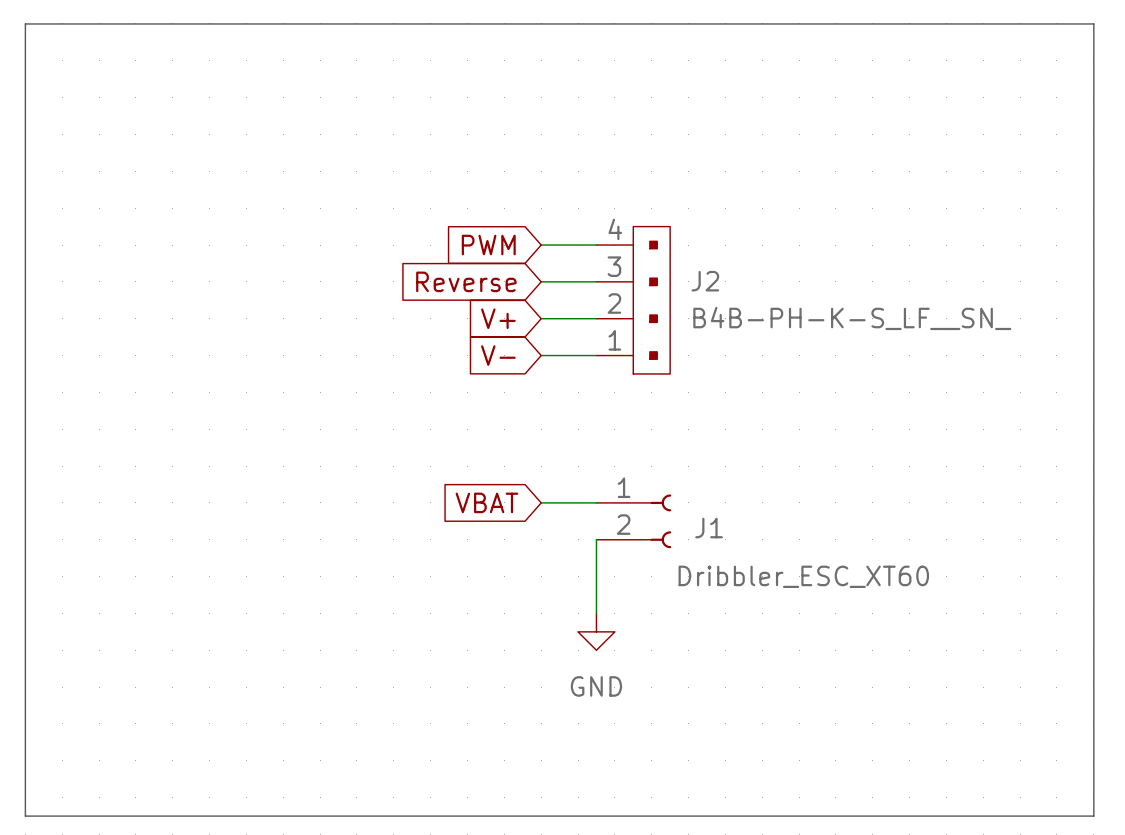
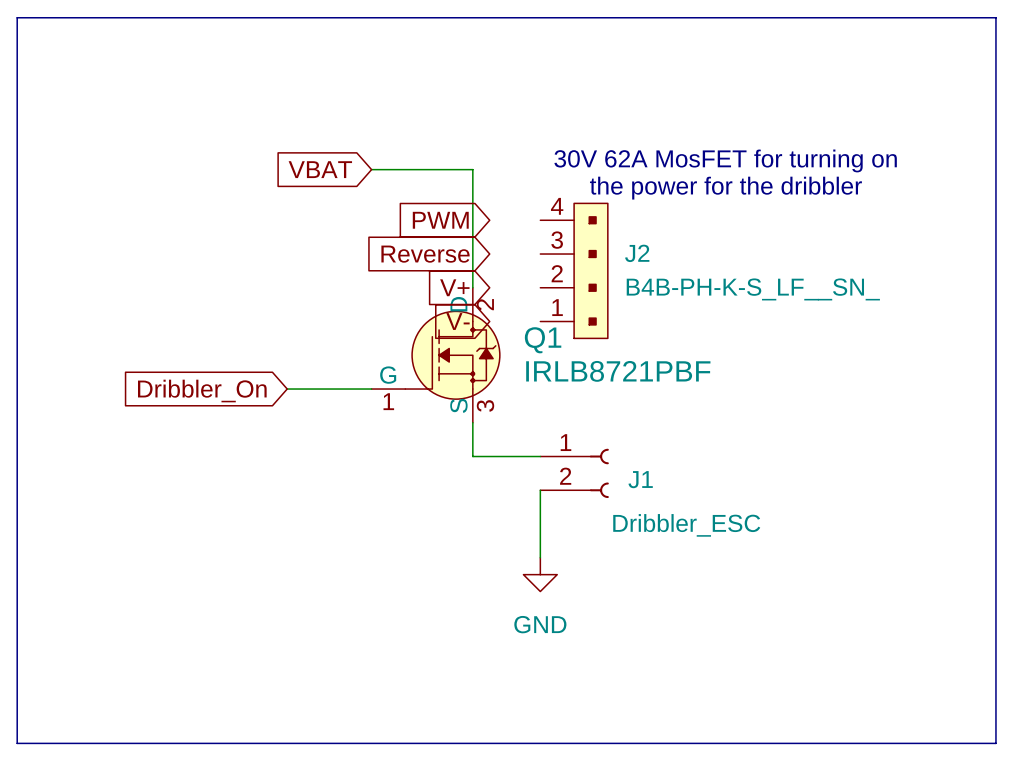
text: none -> 30V 62A MosFET for turning on (725, 160)
wire: none -> (371, 169) (472, 169) (472, 287)
text: none -> the power for the dribbler (725, 188)
wire: (541, 245) (596, 245) -> none
wire: (541, 281) (596, 281) -> none
wire: (541, 318) (596, 318) -> none
wire: (541, 355) (596, 355) -> none
Q1: none -> IRLB8721PBF (435, 355)
wire: none -> (287, 389) (371, 389)
global label: none -> Dribbler_On (202, 391)
wire: none -> (472, 422) (472, 456) (489, 456)
global label position: VBAT (486, 502) -> VBAT (320, 169)
J1 value: Dribbler_ESC_XT60 (803, 576) -> Dribbler_ESC (686, 525)

